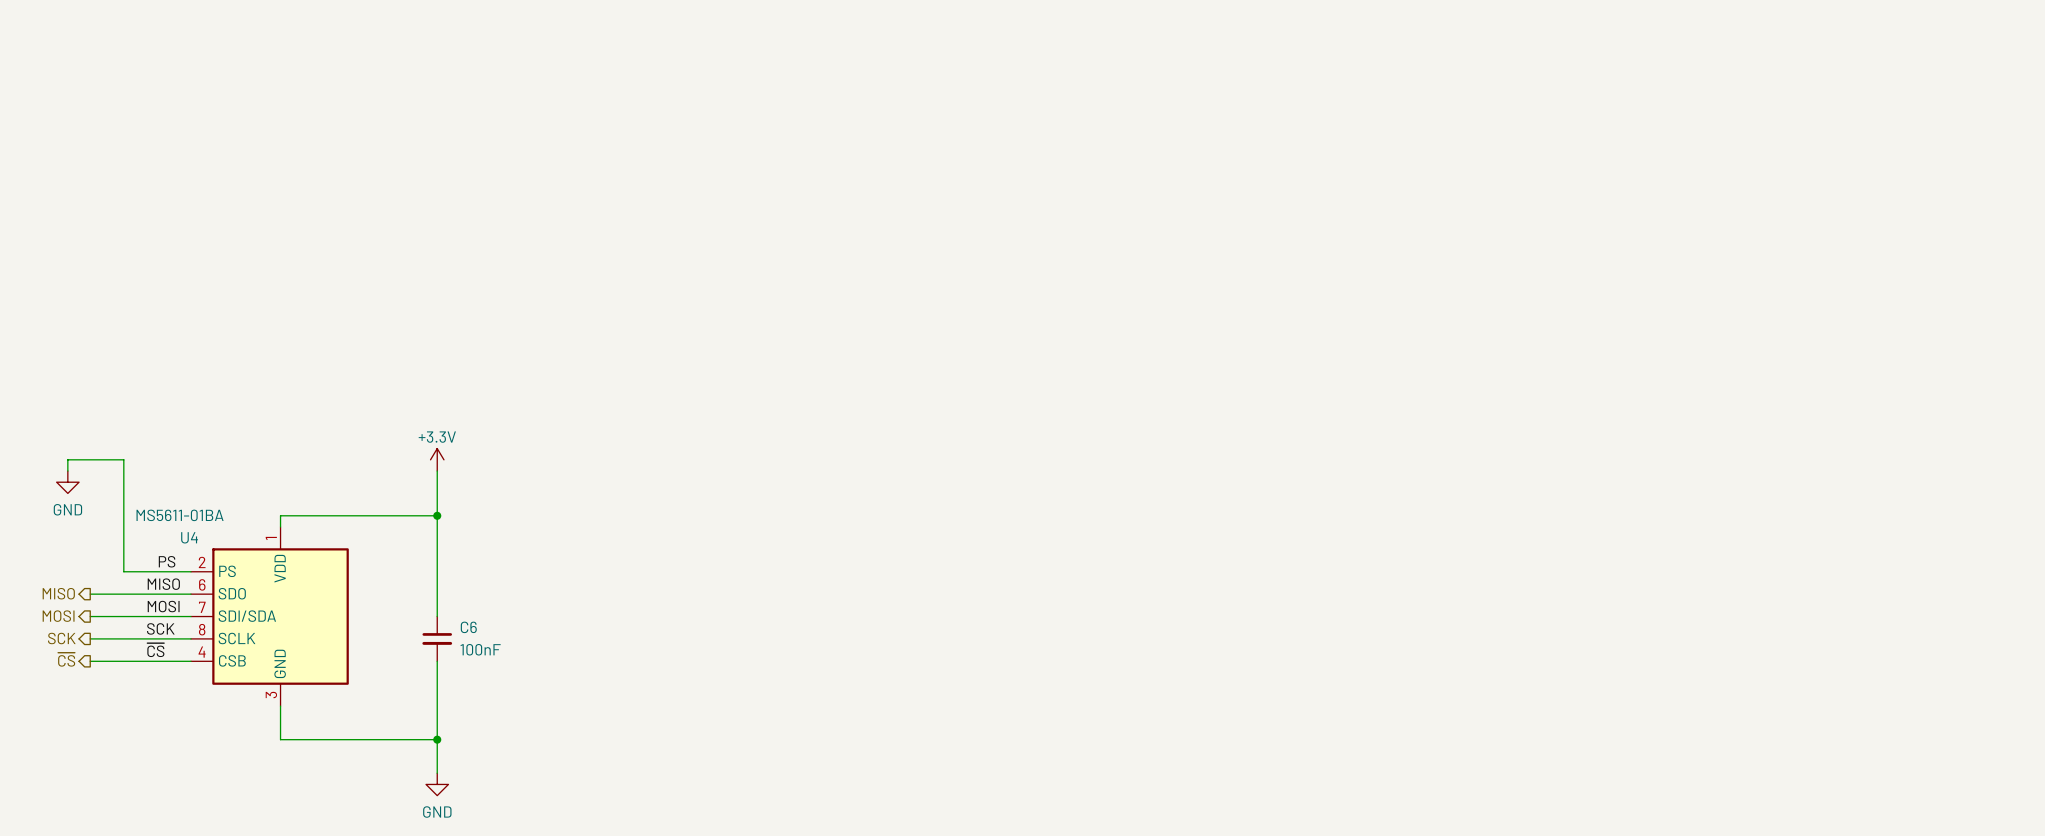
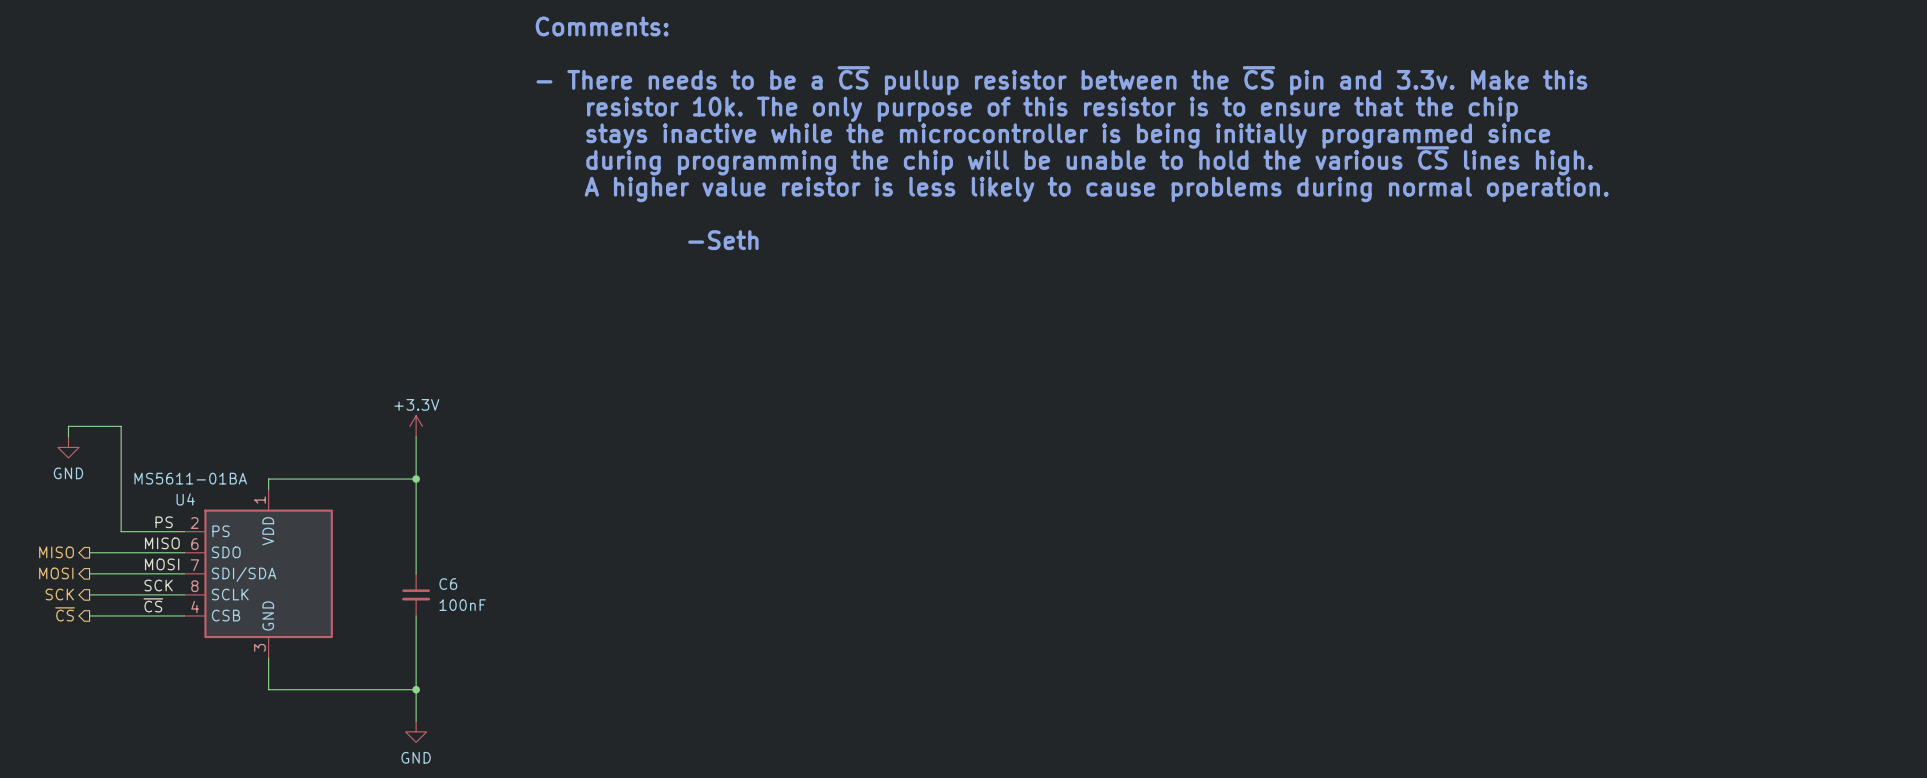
text: none -> Comments: (602, 26)
text: none -> - There needs to be a ~{CS} pullup resistor between the ~{CS} pin and 3.3v. Make this (1061, 80)
text: none -> resistor 10k. The only purpose of this resistor is to ensure that the chip (1052, 109)
text: none -> stays inactive while the microcontroller is being initially programmed since (1068, 136)
text: none -> during programming the chip will be unable to hold the various ~{CS} lines high. (1089, 160)
text: none -> A higher value reistor is less likely to cause problems during normal operation. (1096, 189)
text: none -> -Seth (723, 240)

